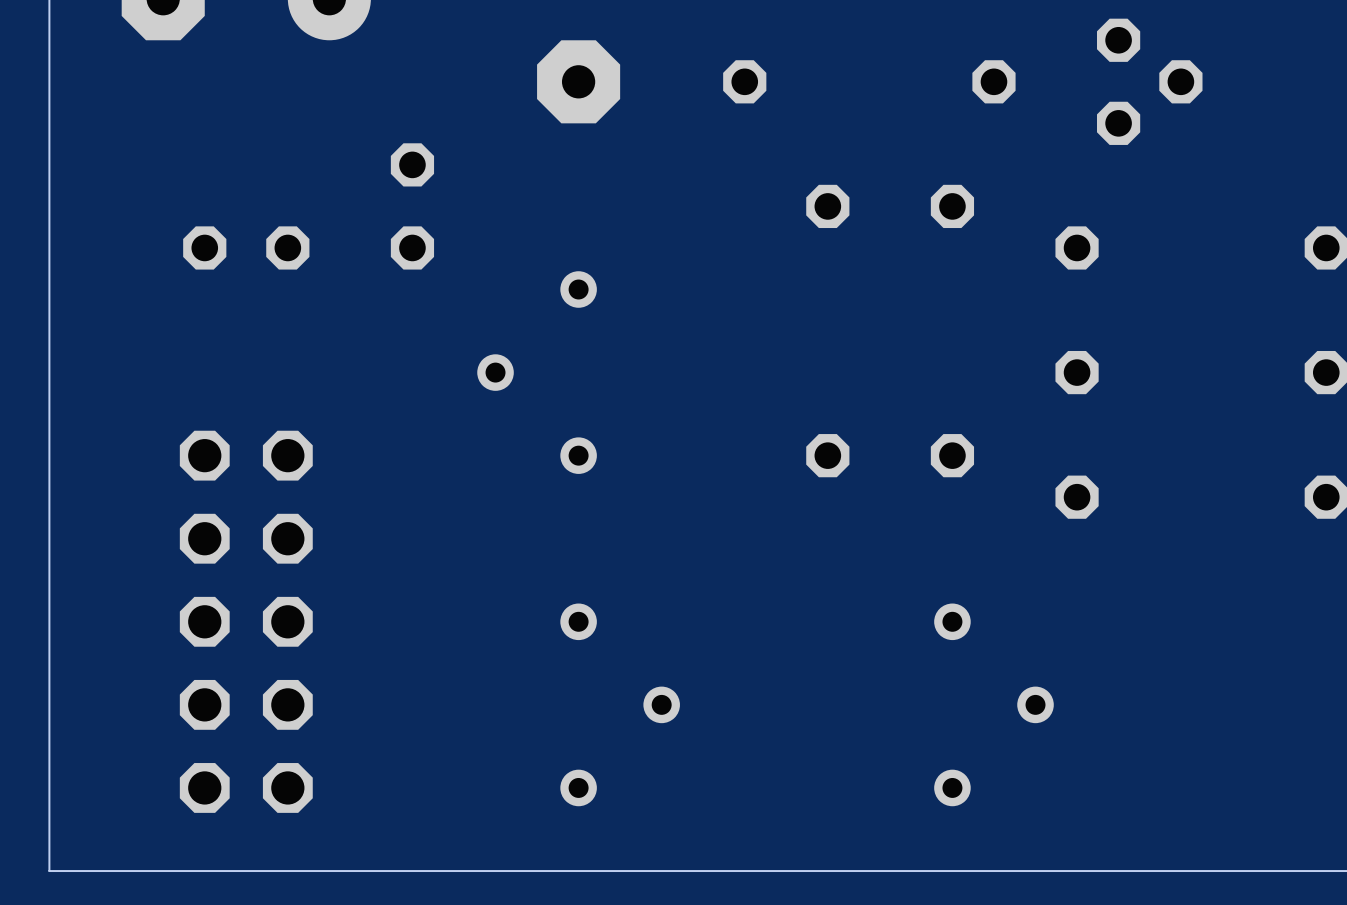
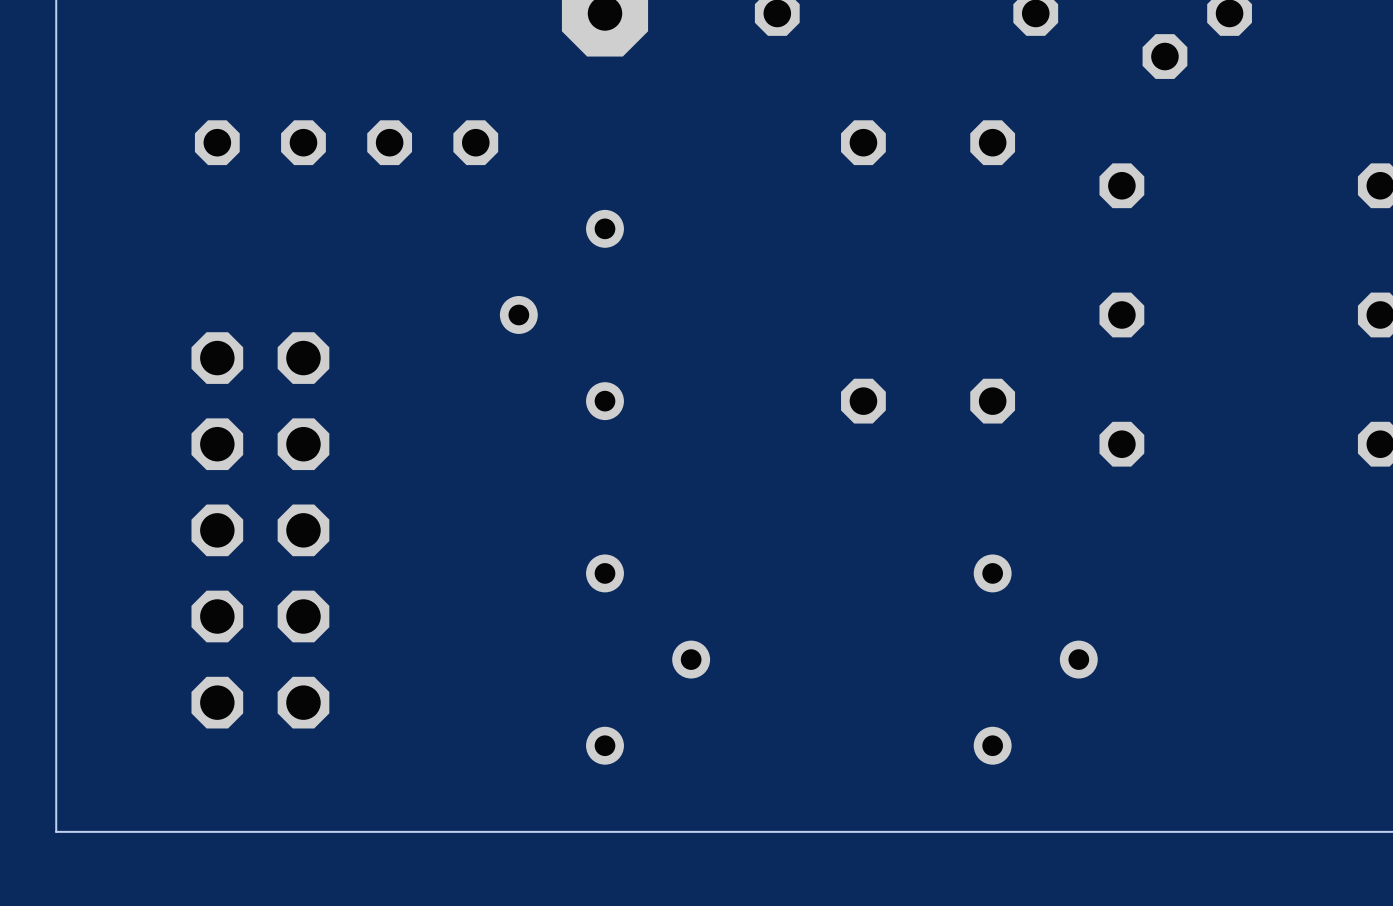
part rotation: 0° (412, 206) -> 90° clockwise (432, 142)
part position: (246, 247) -> (260, 142)
part position: (246, 621) -> (260, 530)

